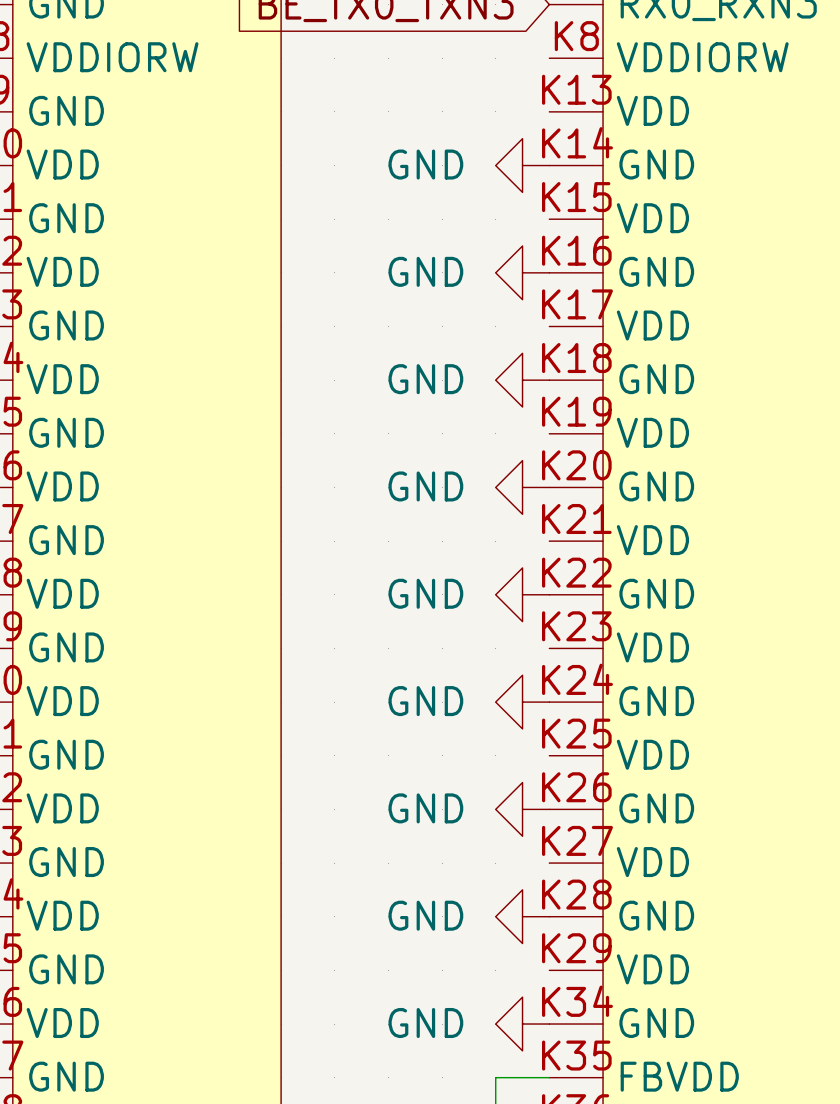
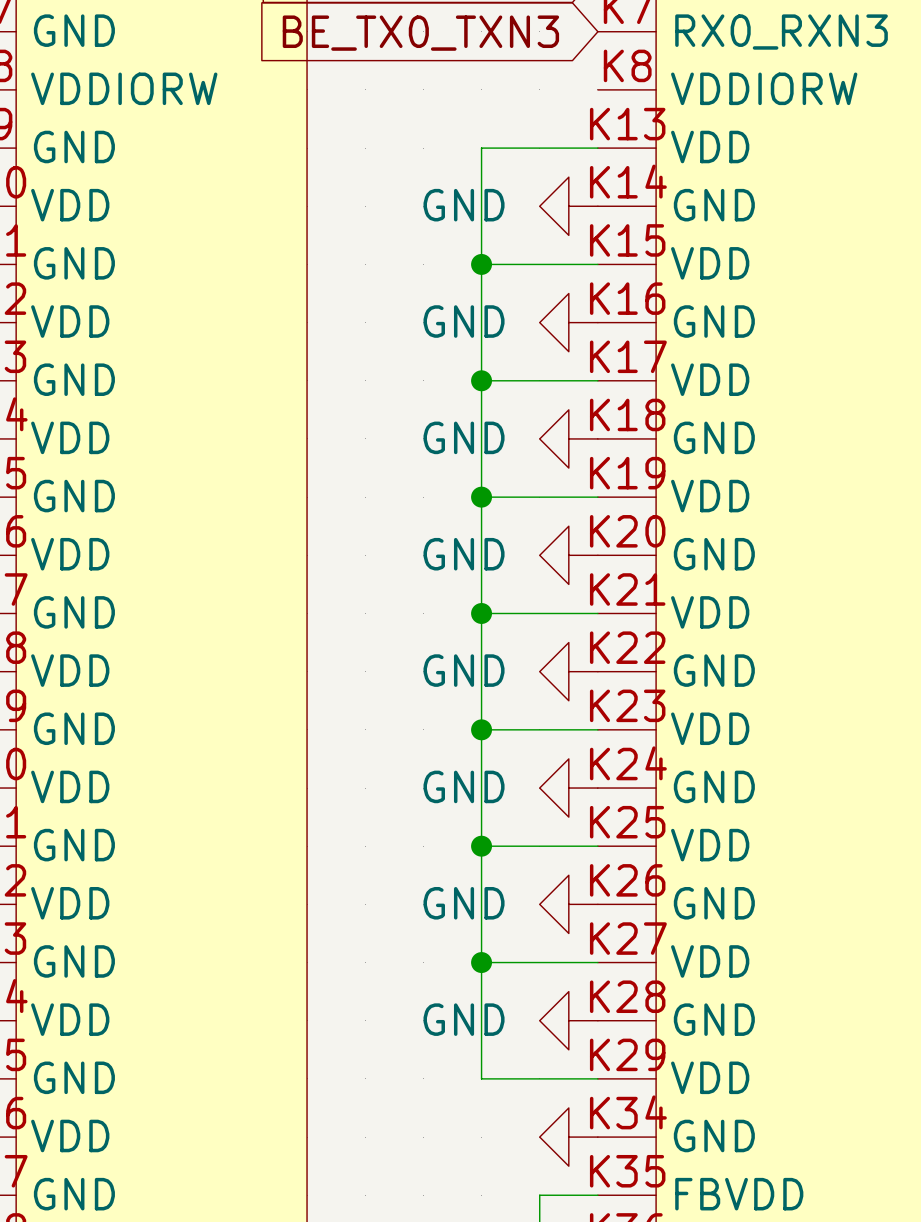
wire: none -> (597, 148) (481, 148) (481, 1078) (597, 1078)
wire: none -> (481, 264) (597, 264)
junction: none -> (481, 264)
wire: none -> (481, 380) (597, 380)
junction: none -> (481, 380)
wire: none -> (481, 497) (597, 497)
junction: none -> (481, 497)
wire: none -> (481, 613) (597, 613)
junction: none -> (481, 613)
wire: none -> (481, 729) (597, 729)
junction: none -> (481, 729)
wire: none -> (481, 846) (597, 846)
junction: none -> (481, 846)
wire: none -> (481, 962) (597, 962)
junction: none -> (481, 962)
power symbol text: GND (425, 1023) -> none

